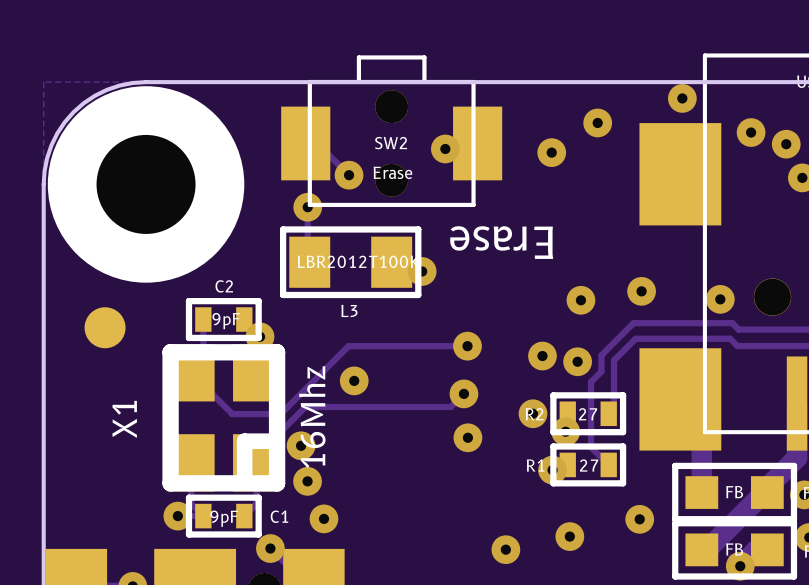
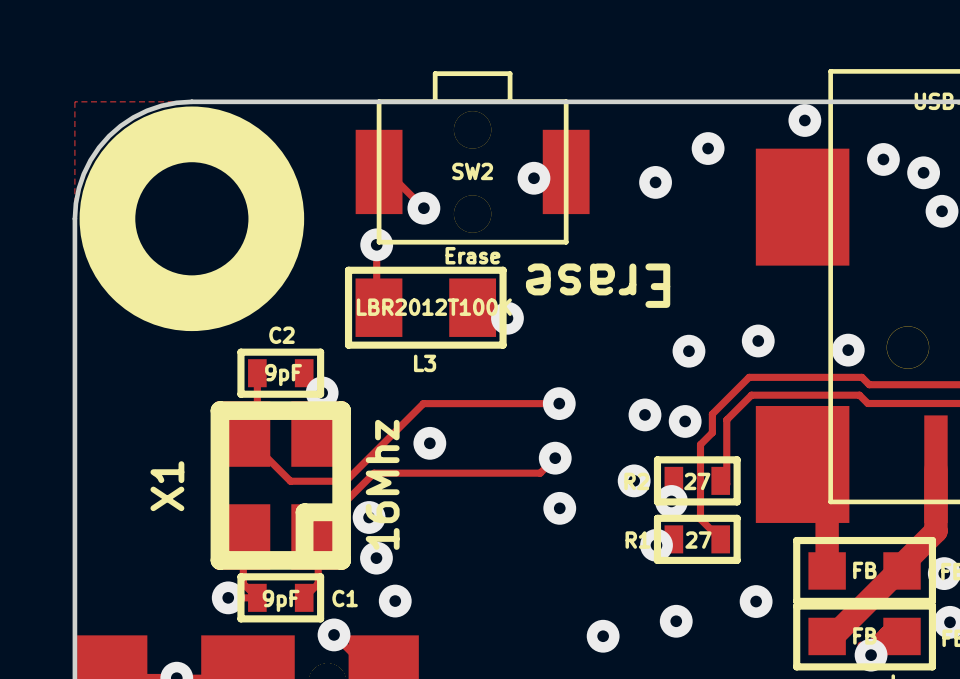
SW2 footprint: [281, 55, 503, 208] -> [355, 71, 590, 245]
SW2 value position: Erase (392, 172) -> Erase (472, 255)
part: (105, 327) -> none

